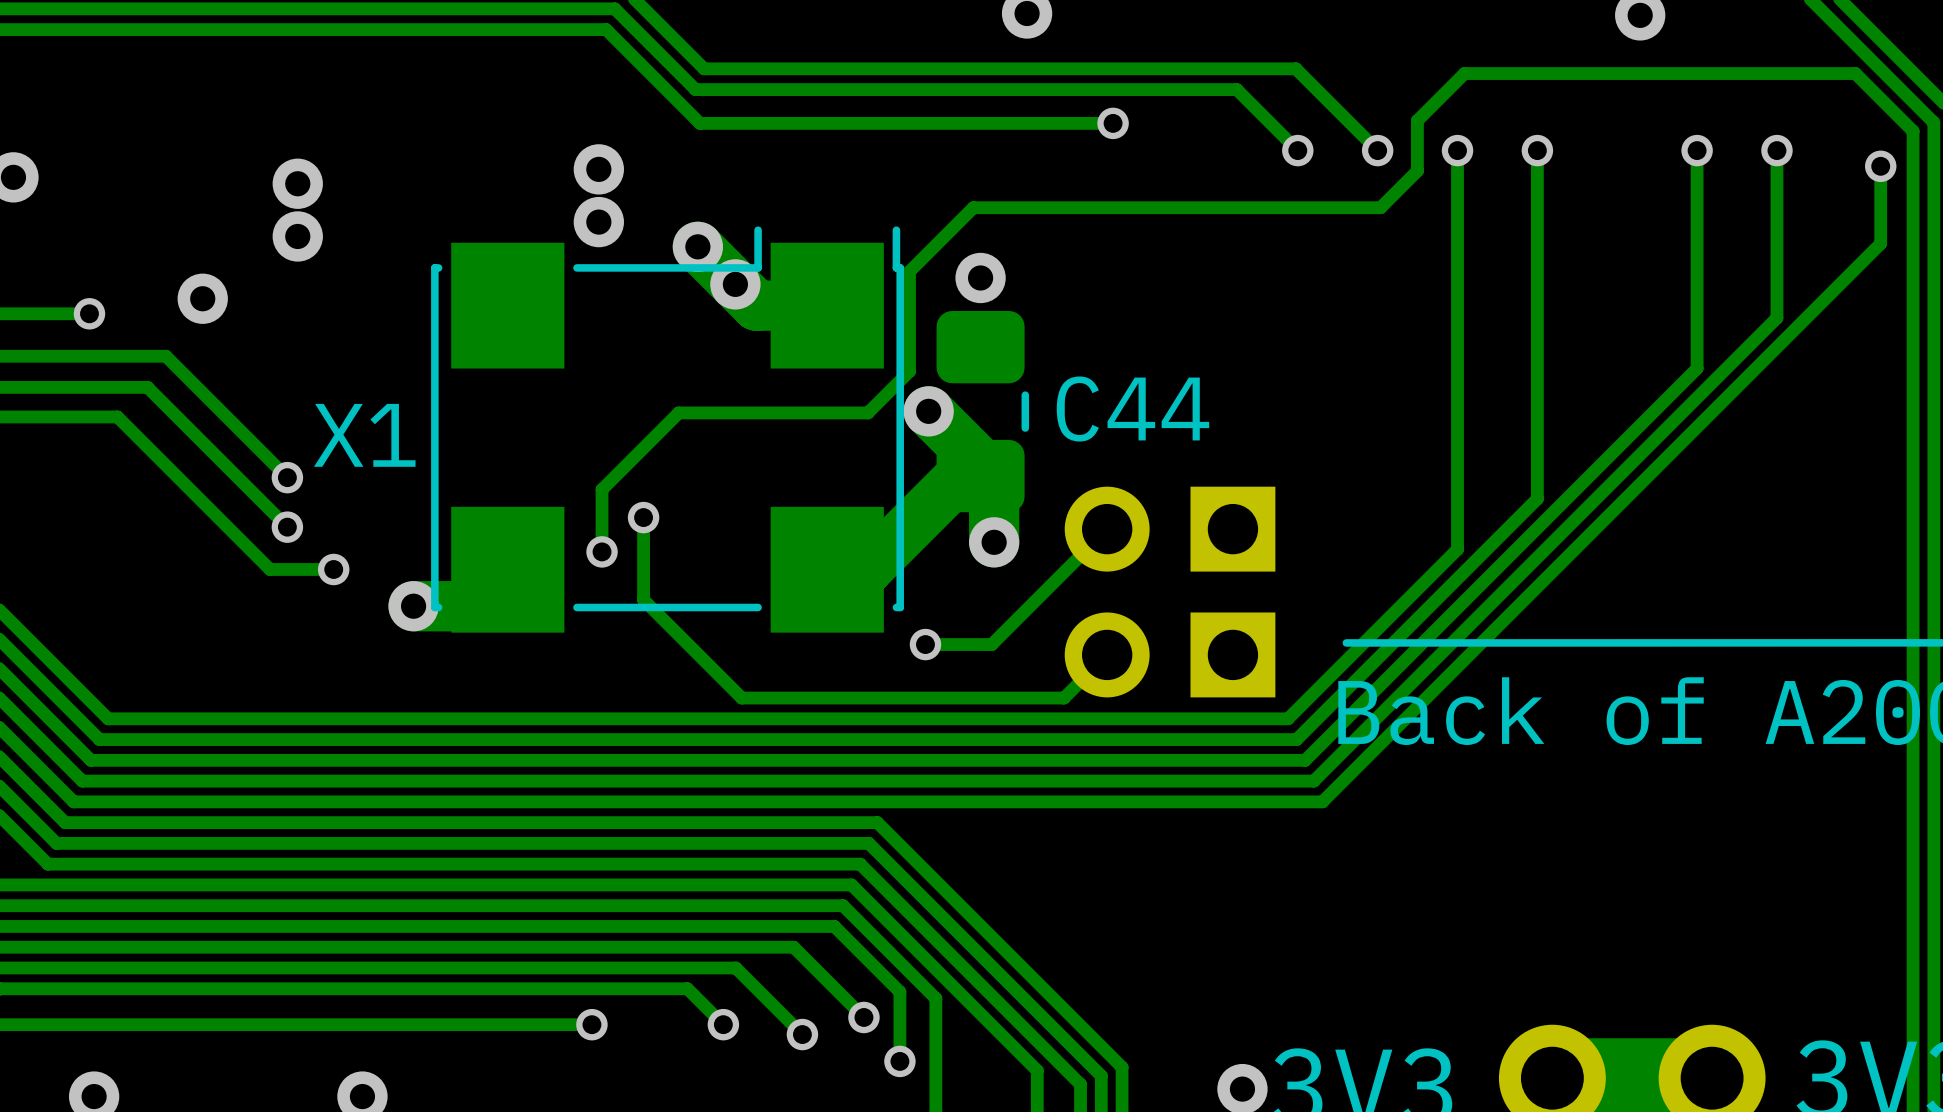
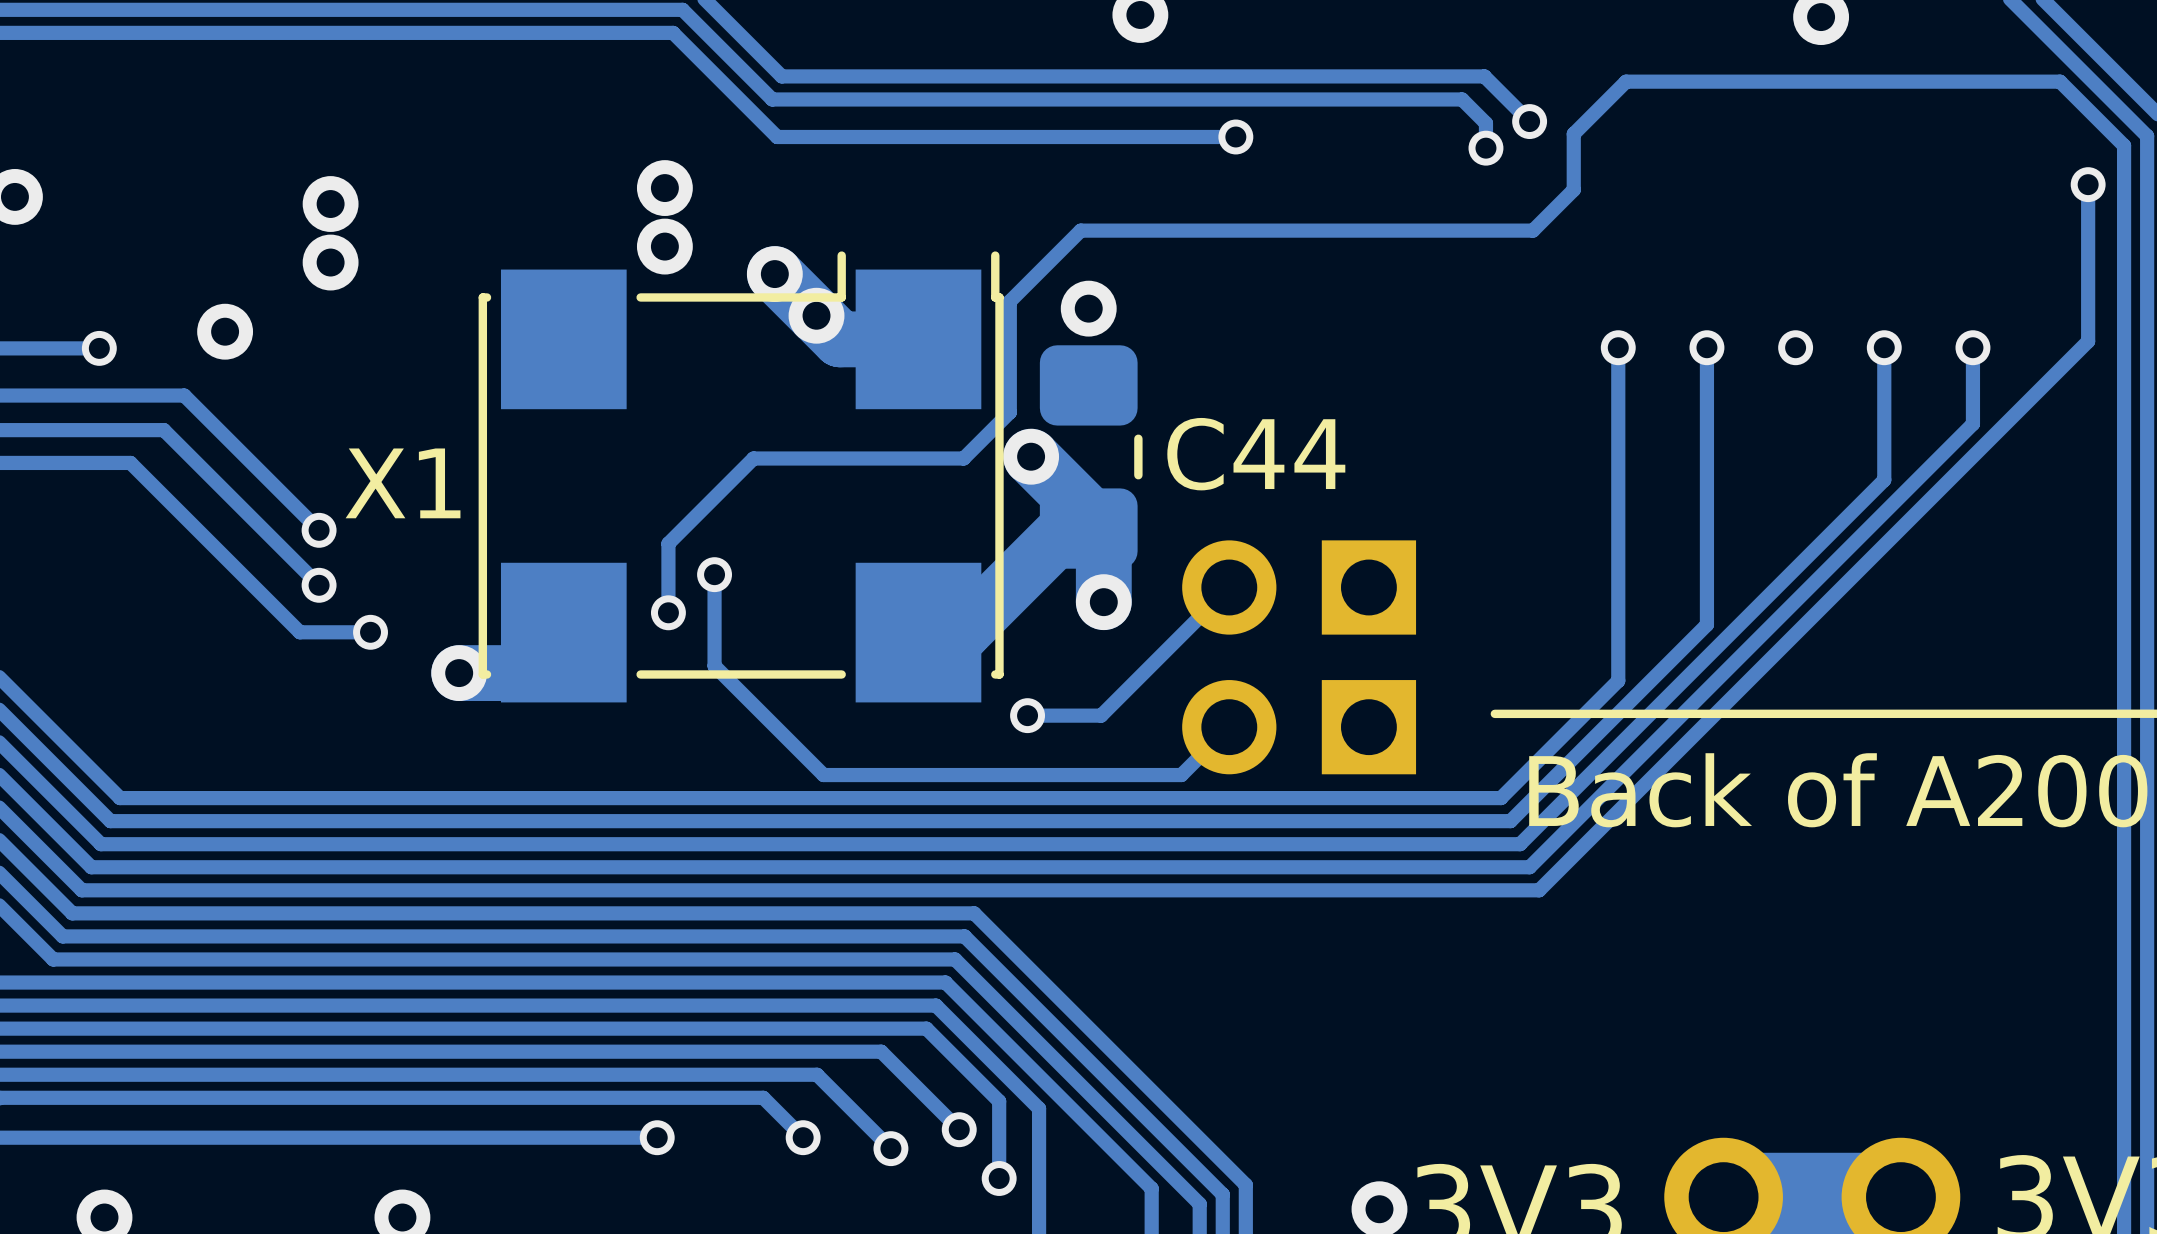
track: (1295, 68) (1377, 150) -> (1438, 76) (1484, 76) (1529, 121)
track: (1236, 89) (1297, 150) -> (1373, 99) (1462, 99) (1485, 123) (1485, 148)
via: none -> (1529, 121)
via: none -> (1485, 148)
via: (1297, 150) -> none
via: (1377, 150) -> none
track: (1457, 150) (1457, 313) -> none
via: (1457, 150) -> none
track: (1537, 150) (1537, 313) -> none
via: (1537, 150) -> none
track: (1697, 150) (1697, 313) -> none
via: (1697, 150) -> none
track: (1776, 150) (1776, 313) -> none
via: (1776, 150) -> none
track: (1880, 243) (1322, 801) -> (2088, 270) (2088, 341) (1539, 890) (1468, 890)
via: none -> (1618, 347)
via: none -> (1706, 347)
via: none -> (1795, 347)
via: none -> (1884, 347)
via: none -> (1972, 347)
track: (1776, 318) (1313, 781) -> (1972, 353) (1972, 423) (1529, 867) (1458, 867)
track: (1697, 368) (1305, 760) -> (1884, 409) (1884, 480) (1520, 844) (1449, 844)
track: (1537, 498) (1296, 739) -> (1706, 553) (1706, 624) (1510, 821) (1439, 821)
track: (1457, 549) (1288, 718) -> (1618, 609) (1618, 680) (1500, 798) (1430, 798)

